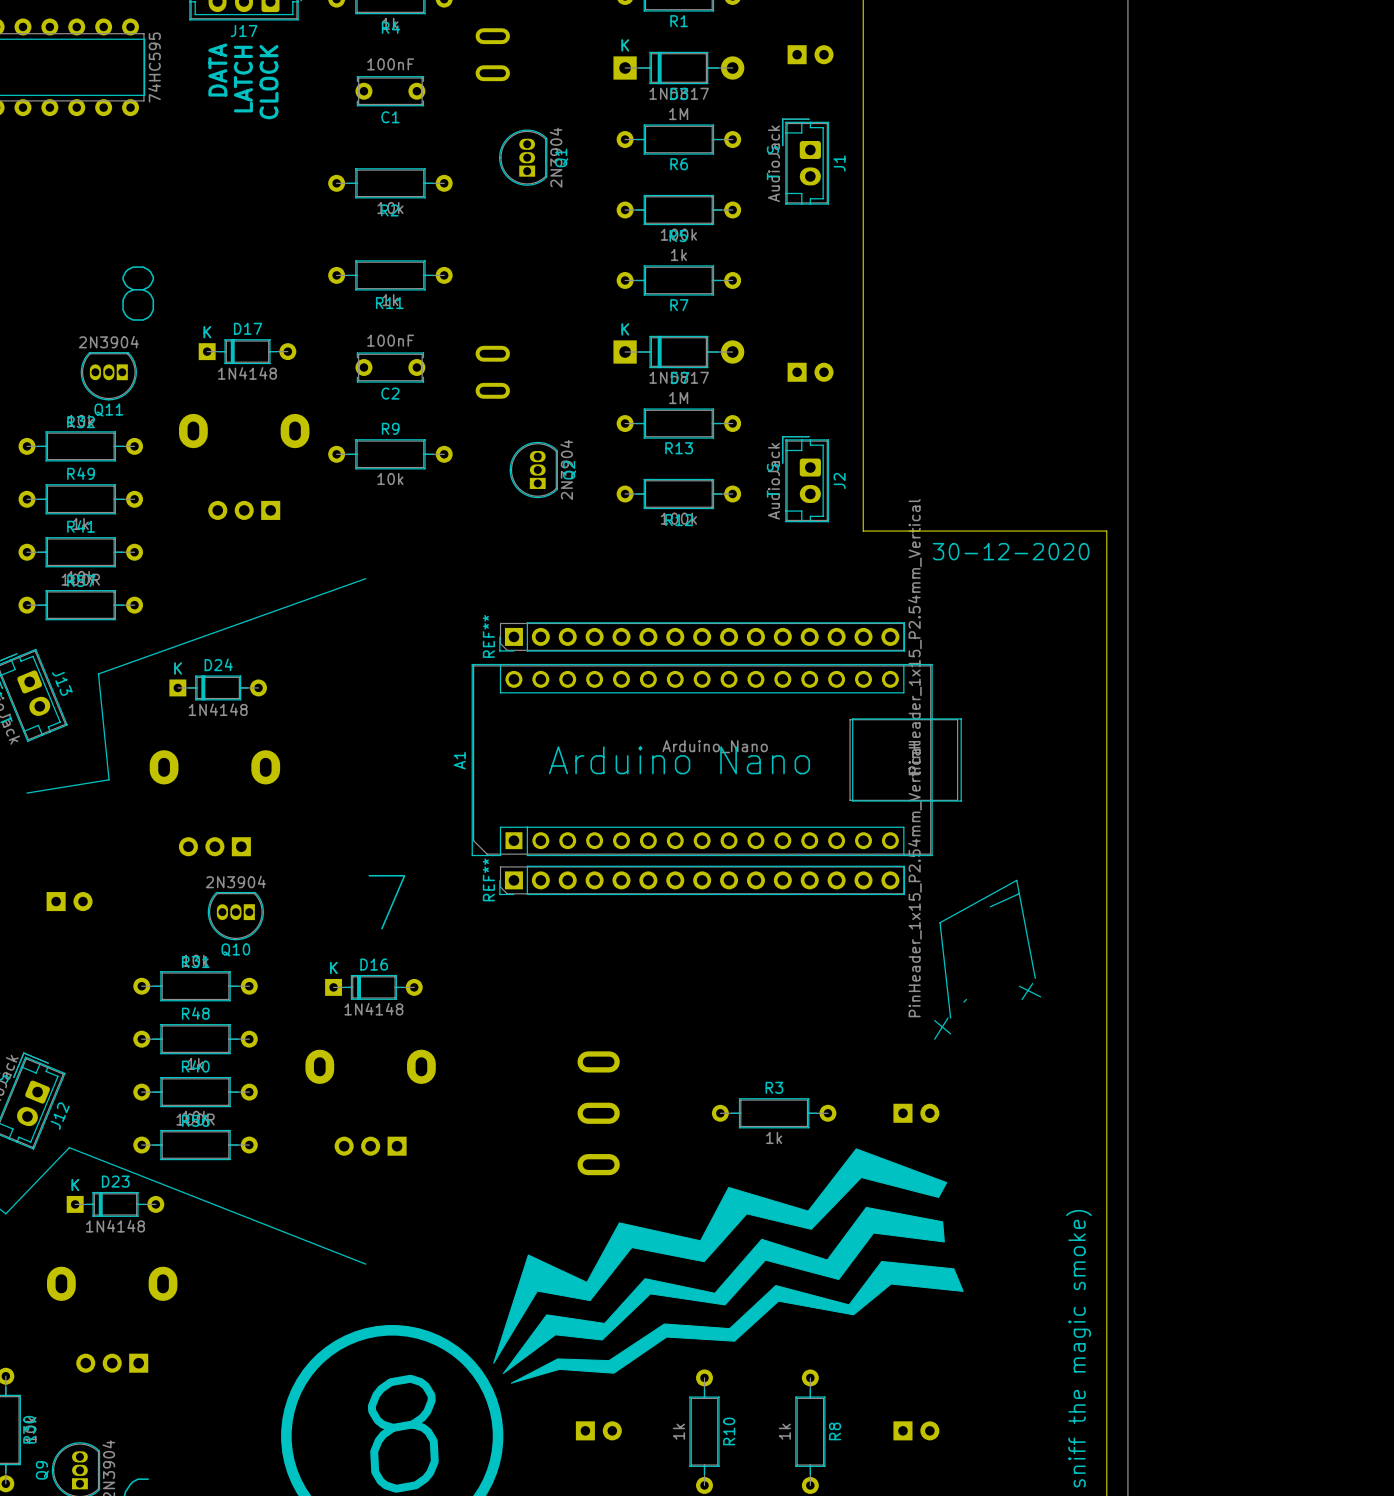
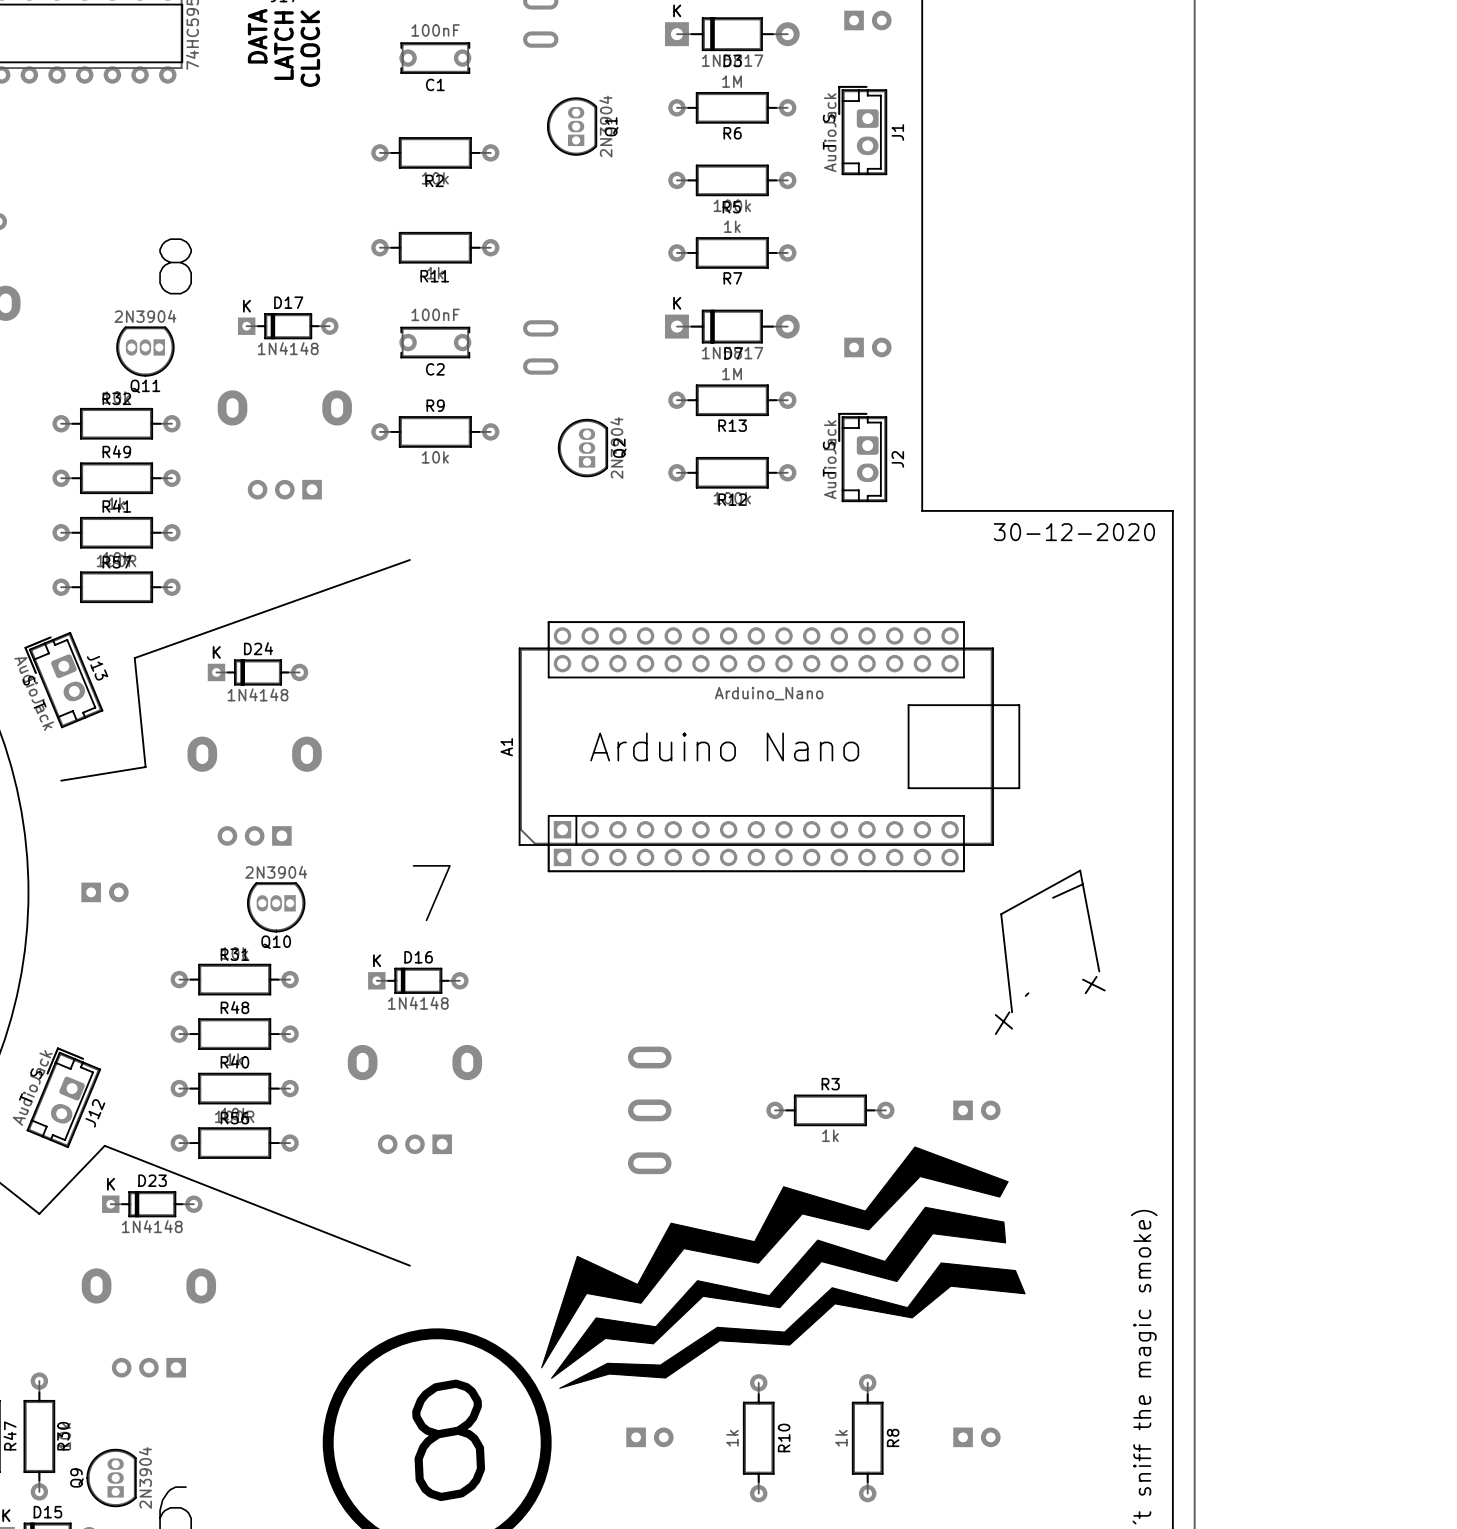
REF**: PinHeader_1x15_P2.54mm_Vertical (702, 636) -> none
A1 footprint: [471, 663, 959, 857] -> [518, 621, 1020, 872]
line: (852, 718) (852, 800) (961, 800) (961, 718) (852, 718) -> none
A1 value position: Arduino_Nano (715, 746) -> Arduino_Nano (769, 693)
text: Arduino Nano (679, 760) -> none
REF**: PinHeader_1x15_P2.54mm_Vertical (702, 880) -> none

